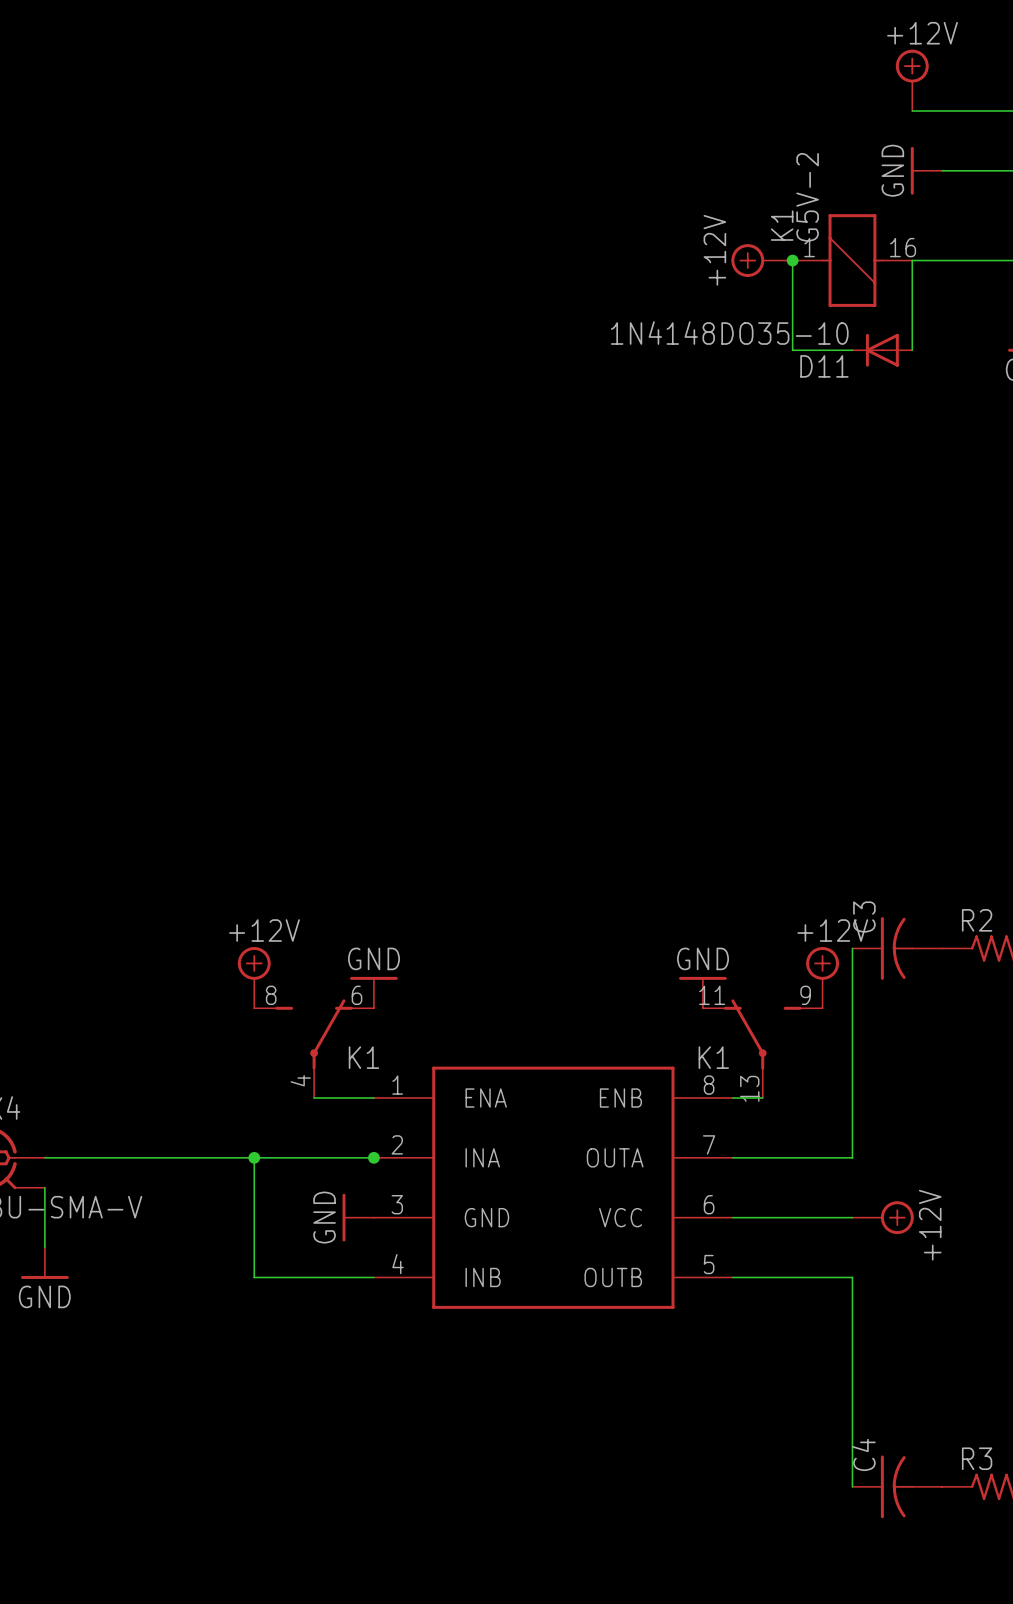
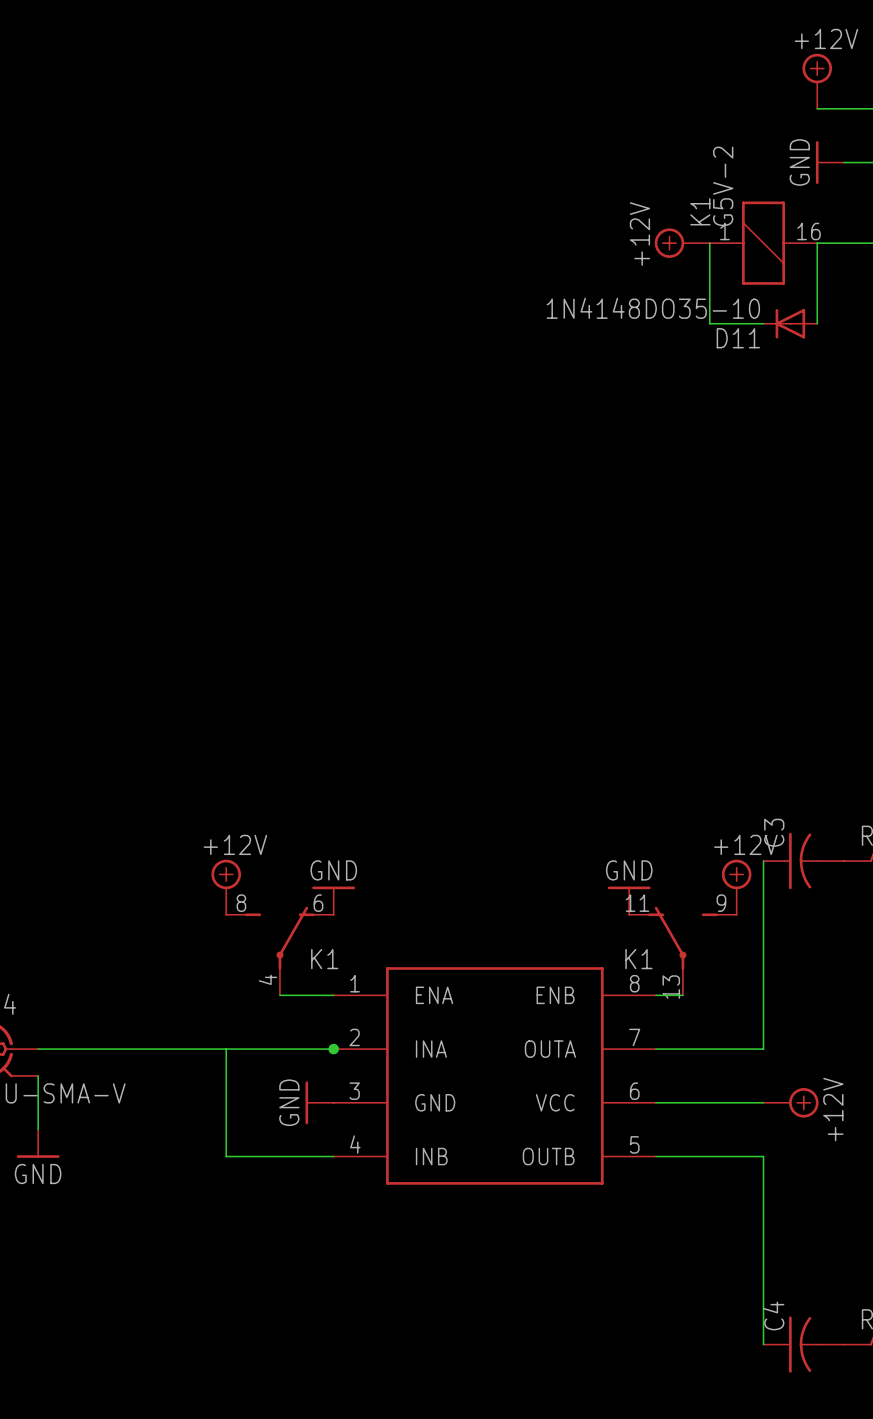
junction: (792, 260) -> none
junction: (254, 1157) -> none

